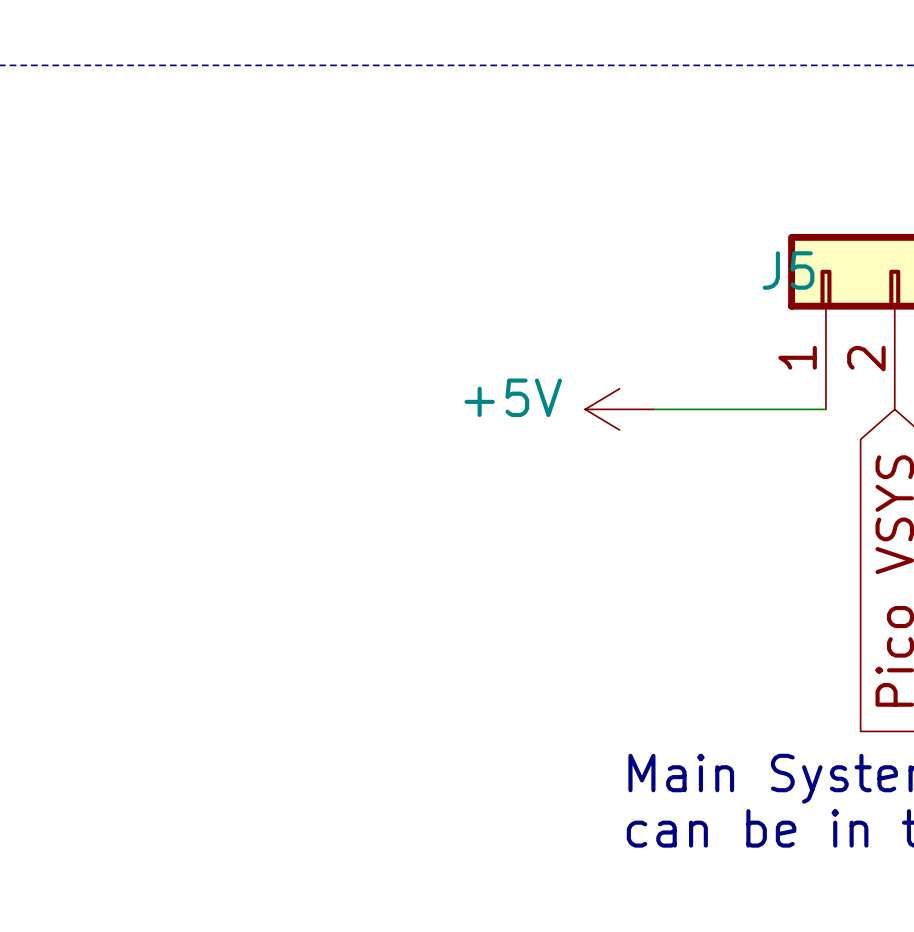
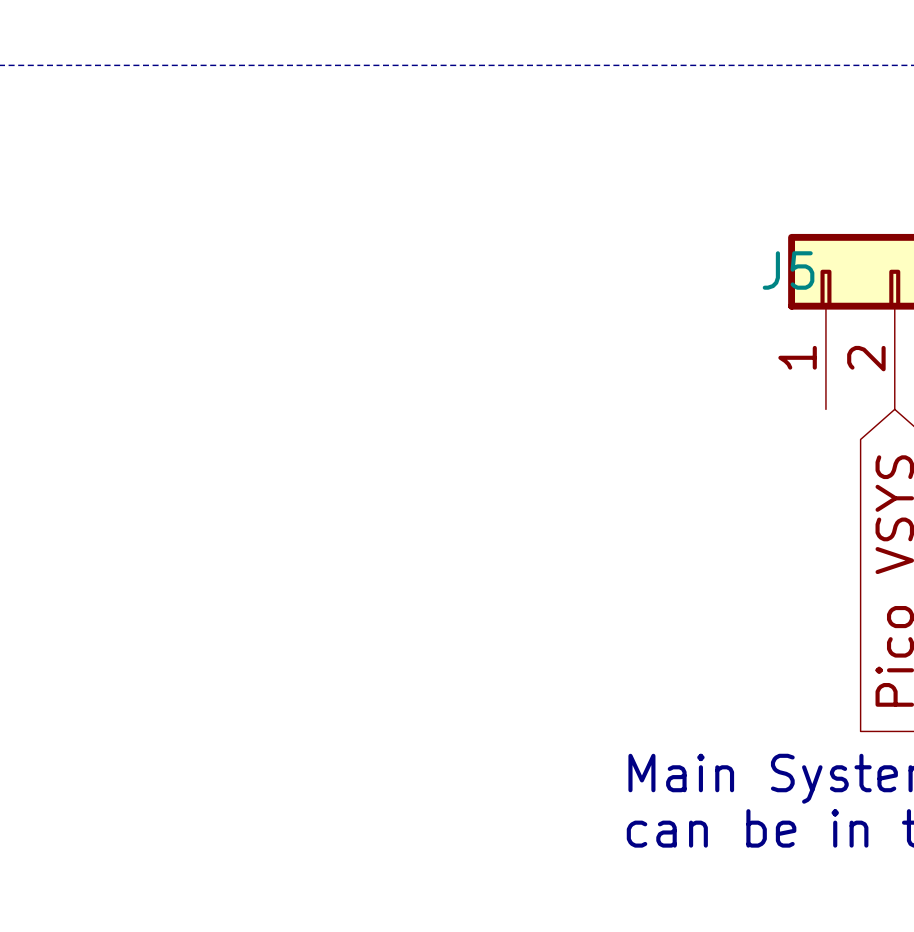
power symbol: +5V (619, 409) -> none
wire: (653, 409) (825, 409) -> none

